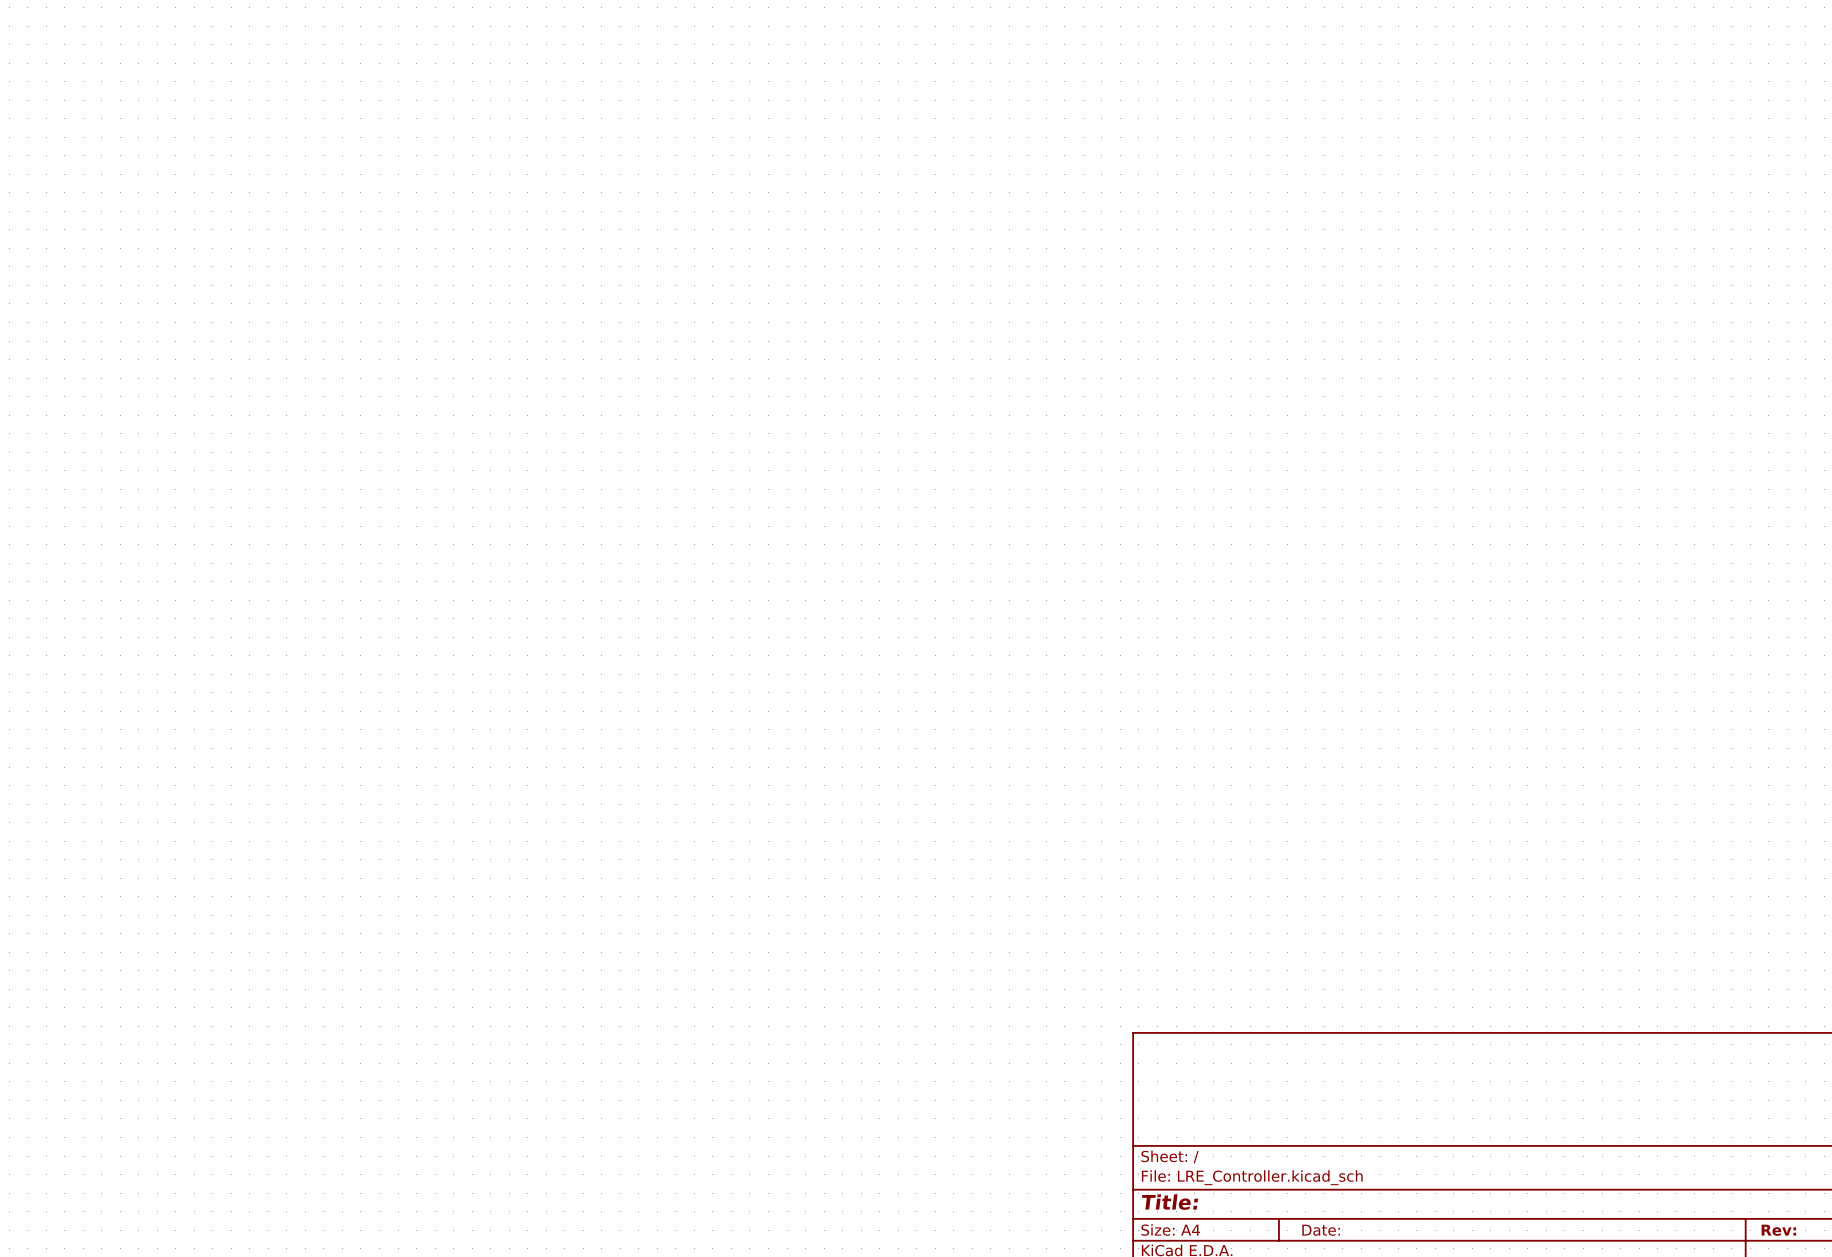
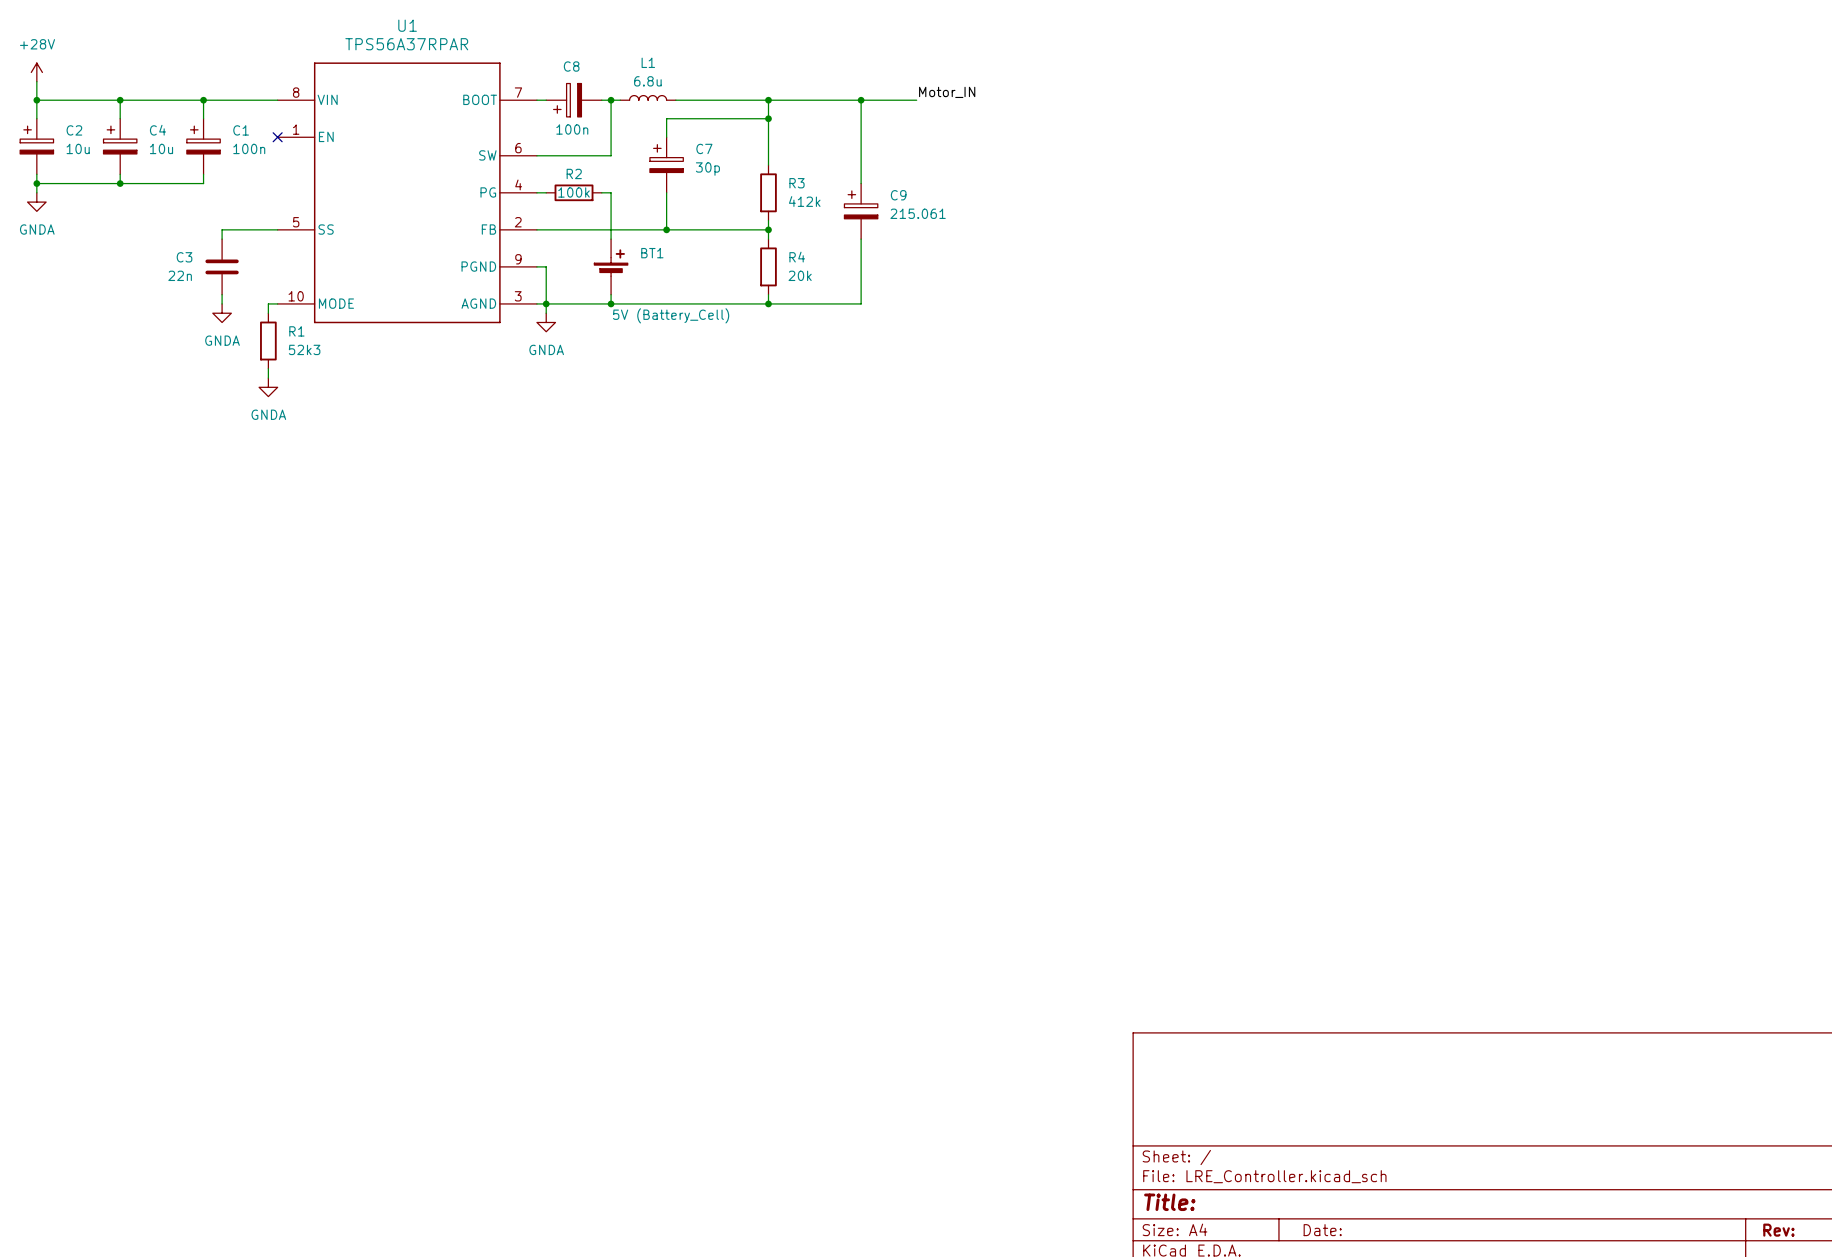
power symbol: none -> +28V (36, 72)
wire: none -> (36, 81) (36, 118)
label: none -> Motor_IN (947, 92)
L1: none -> 6.8u (648, 97)
wire: none -> (36, 100) (277, 100)
junction: none -> (36, 100)
wire: none -> (120, 100) (120, 118)
junction: none -> (120, 100)
wire: none -> (203, 100) (203, 118)
junction: none -> (203, 100)
wire: none -> (536, 100) (546, 100)
C8: none -> 100n (574, 100)
wire: none -> (601, 100) (620, 100)
wire: none -> (611, 100) (611, 155) (536, 155)
junction: none -> (611, 100)
wire: none -> (675, 100) (916, 100)
wire: none -> (768, 100) (768, 165)
junction: none -> (768, 100)
wire: none -> (861, 100) (861, 183)
junction: none -> (861, 100)
wire: none -> (768, 118) (666, 118) (666, 137)
junction: none -> (768, 118)
no-connect mark: none -> (277, 137)
C2: none -> 10u (36, 146)
C4: none -> 10u (120, 146)
C1: none -> 100n (203, 146)
C7: none -> 30p (666, 165)
wire: none -> (36, 174) (36, 192)
wire: none -> (120, 174) (120, 183)
wire: none -> (203, 174) (203, 183) (36, 183)
junction: none -> (36, 183)
junction: none -> (120, 183)
U1: none -> TPS56A37RPAR (407, 192)
wire: none -> (536, 192) (546, 192)
R2: none -> 100k (574, 192)
wire: none -> (601, 192) (611, 192) (611, 239)
wire: none -> (666, 192) (666, 229)
R3: none -> 412k (768, 192)
power symbol: none -> GNDA (36, 202)
C9: none -> 215.061 (861, 211)
wire: none -> (768, 220) (768, 239)
wire: none -> (277, 229) (222, 229) (222, 239)
wire: none -> (536, 229) (768, 229)
junction: none -> (666, 229)
junction: none -> (768, 229)
wire: none -> (861, 239) (861, 303) (536, 303)
C3: none -> 22n (222, 266)
wire: none -> (536, 266) (546, 266) (546, 313)
BT1: none -> 5V (Battery_Cell) (611, 266)
R4: none -> 20k (768, 266)
wire: none -> (222, 294) (222, 303)
wire: none -> (611, 294) (611, 303)
wire: none -> (768, 294) (768, 303)
wire: none -> (277, 303) (268, 303) (268, 313)
junction: none -> (546, 303)
junction: none -> (611, 303)
junction: none -> (768, 303)
power symbol: none -> GNDA (222, 313)
power symbol: none -> GNDA (546, 322)
R1: none -> 52k3 (268, 341)
wire: none -> (268, 368) (268, 378)
power symbol: none -> GNDA (268, 387)

